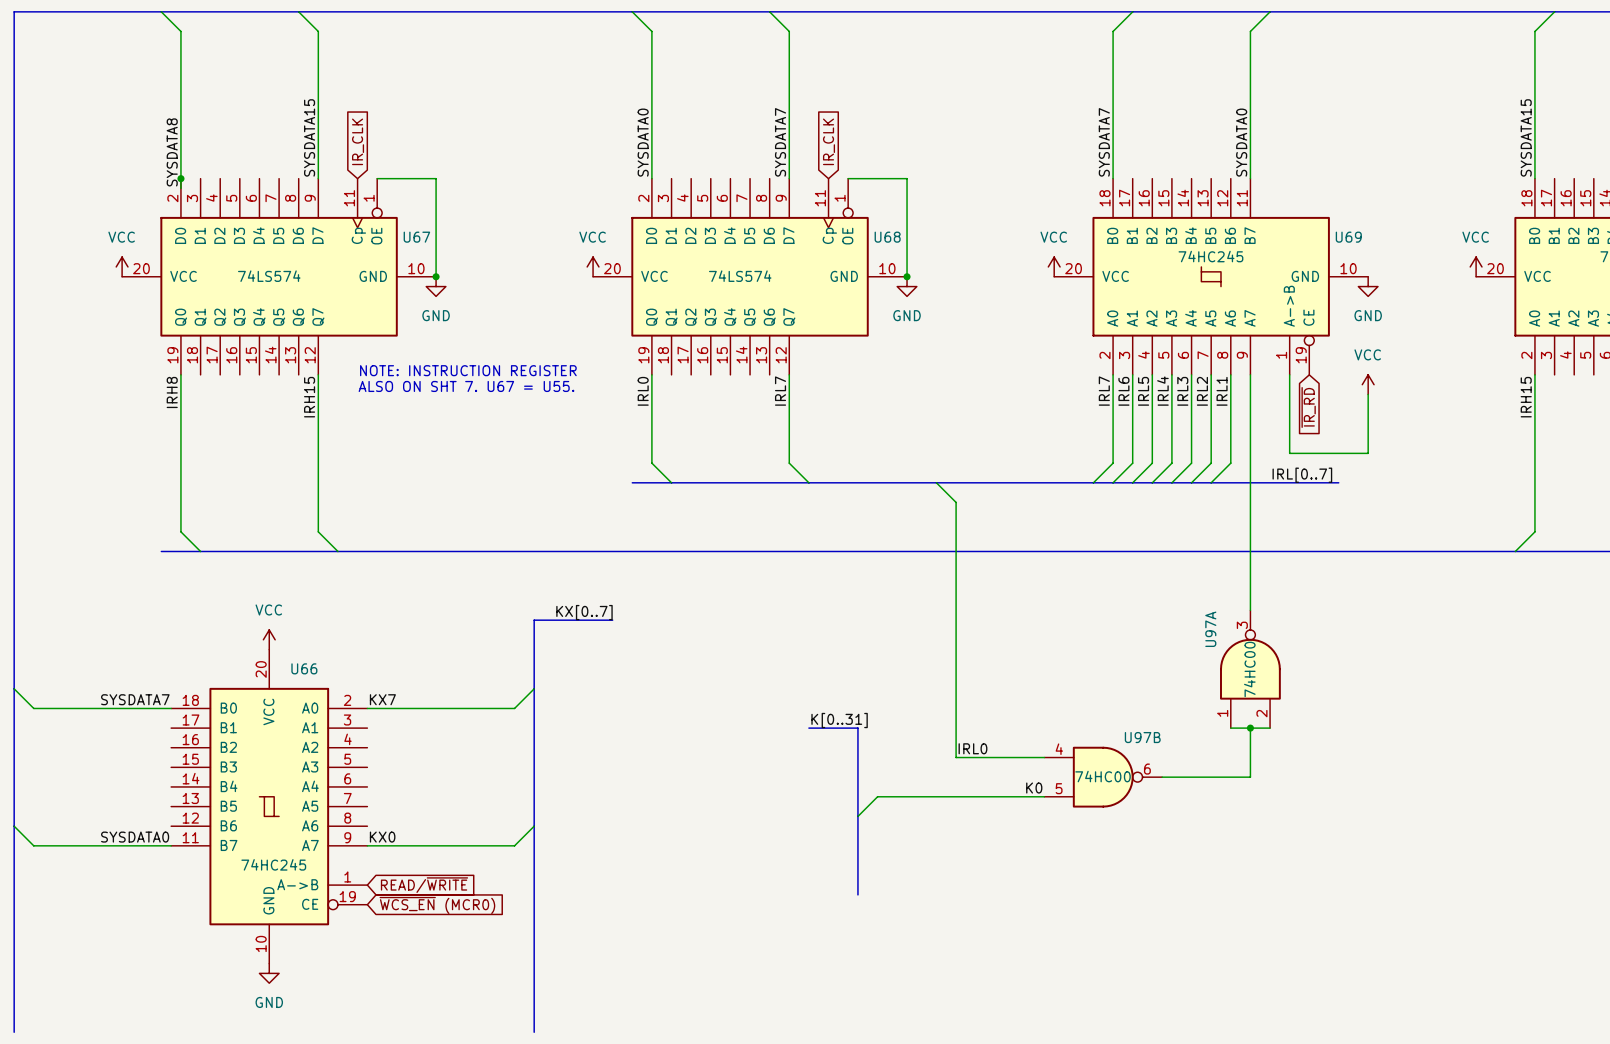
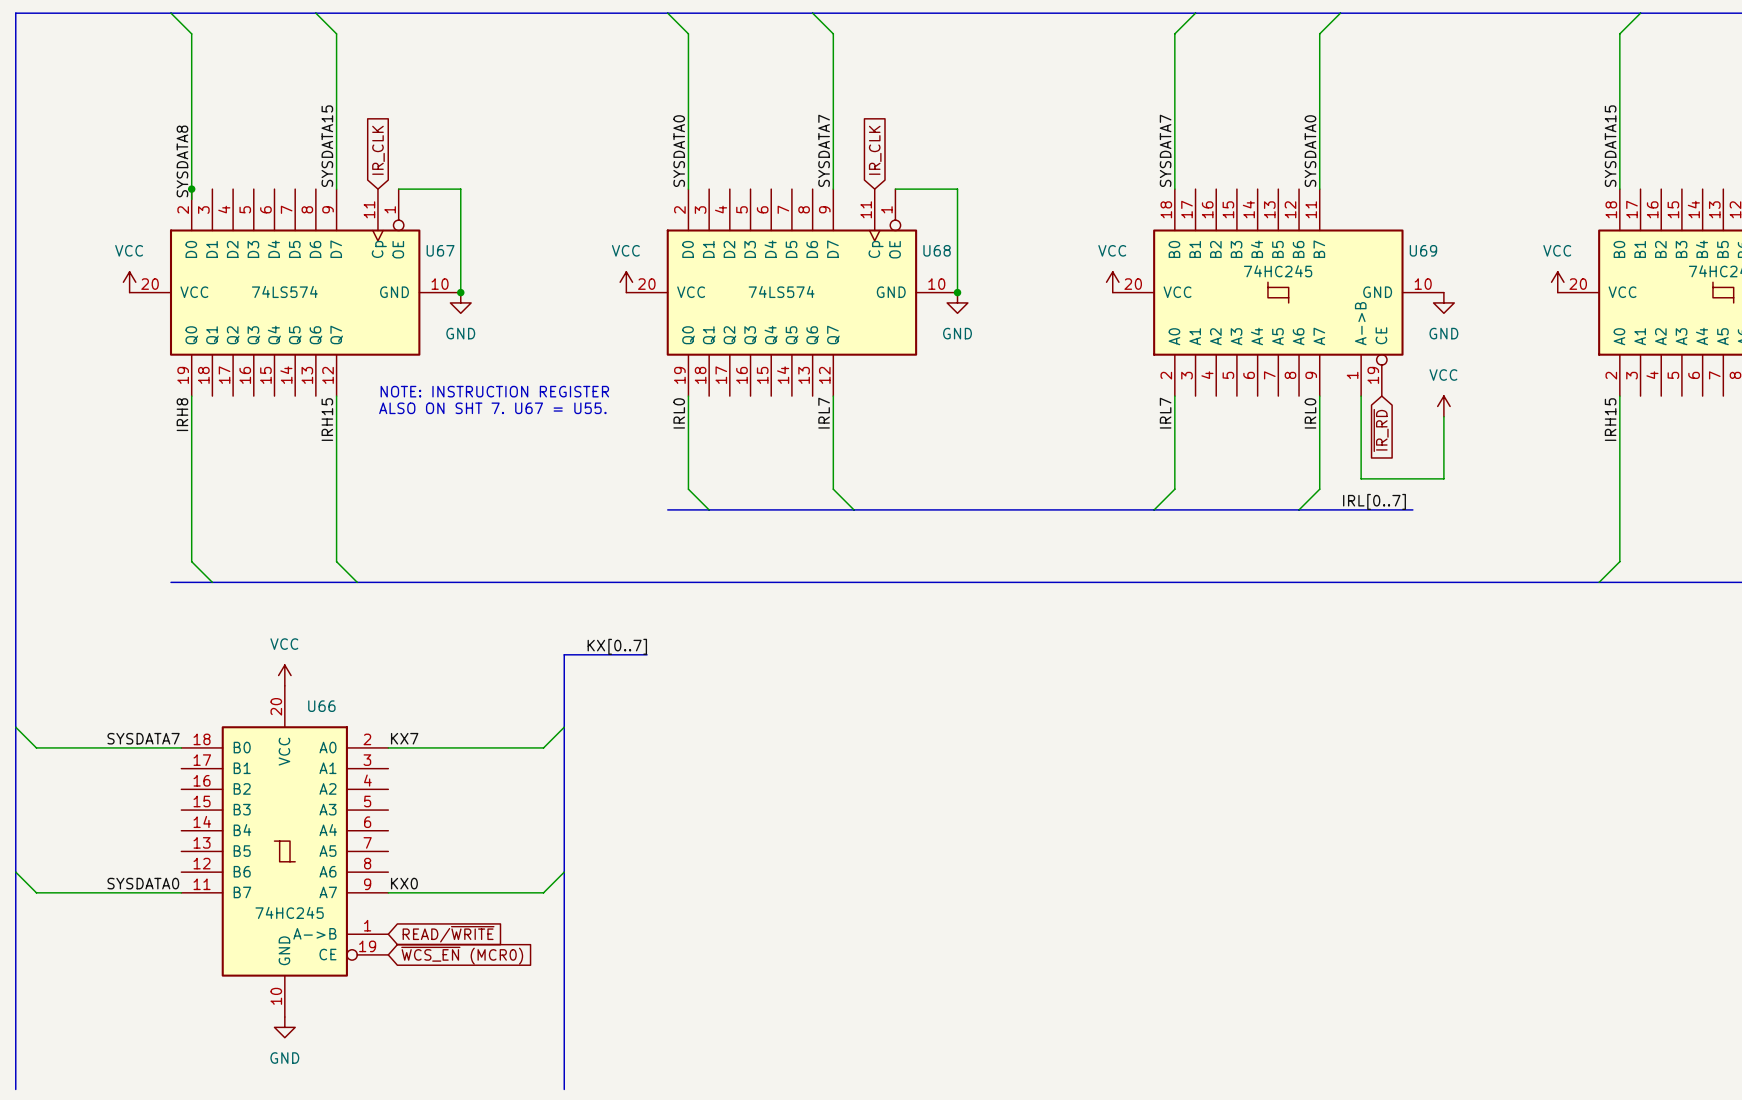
wire: (1132, 374) (1132, 463) (1113, 482) -> none
wire: (1152, 374) (1152, 463) (1132, 482) -> none
wire: (1171, 374) (1171, 463) (1152, 482) -> none
wire: (1191, 374) (1191, 463) (1171, 482) -> none
wire: (1211, 374) (1211, 463) (1191, 482) -> none
wire: (1230, 374) (1230, 463) (1211, 482) -> none
label: IRL6 (1123, 391) -> none
label: IRL5 (1143, 391) -> none
label: IRL4 (1162, 391) -> none
label: IRL3 (1182, 391) -> none
label: IRL2 (1202, 391) -> none
label: IRL1 (1222, 391) -> IRL0 (1310, 413)
wire: (1250, 463) (1250, 610) -> (1319, 489) (1299, 509)
wire: (936, 482) (956, 502) (956, 757) (1044, 757) -> none
U97A: 74HC00 (1250, 669) -> none
label: K[0..31] (839, 720) -> none
bus: (808, 728) (857, 728) (857, 894) -> none
wire: (1230, 728) (1270, 728) -> none
wire: (1250, 728) (1250, 777) (1162, 777) -> none
junction: (1250, 728) -> none
label: IRL0 (972, 748) -> none
U97B: 74HC00 (1103, 777) -> none
label: K0 (1034, 788) -> none
wire: (1044, 796) (877, 796) (857, 816) -> none

